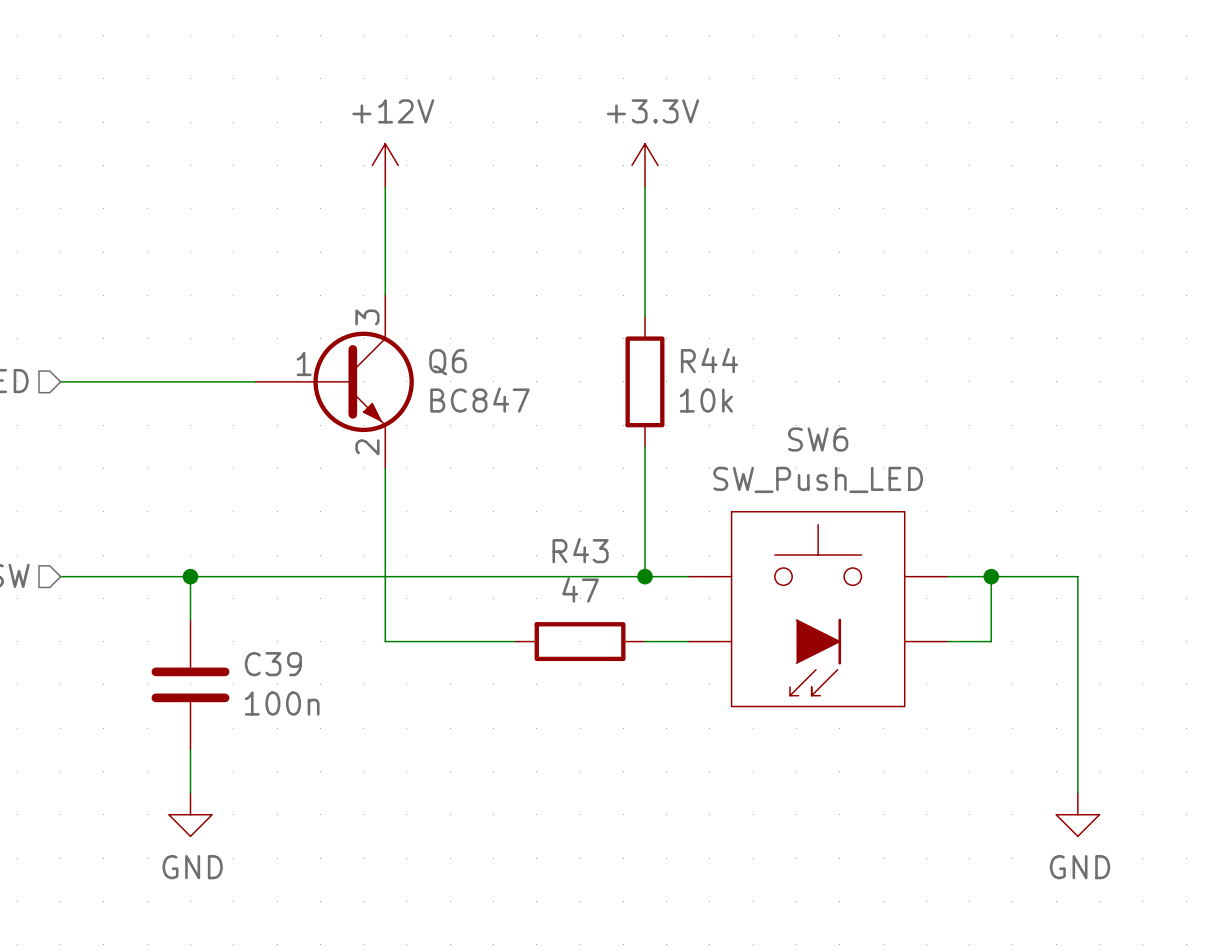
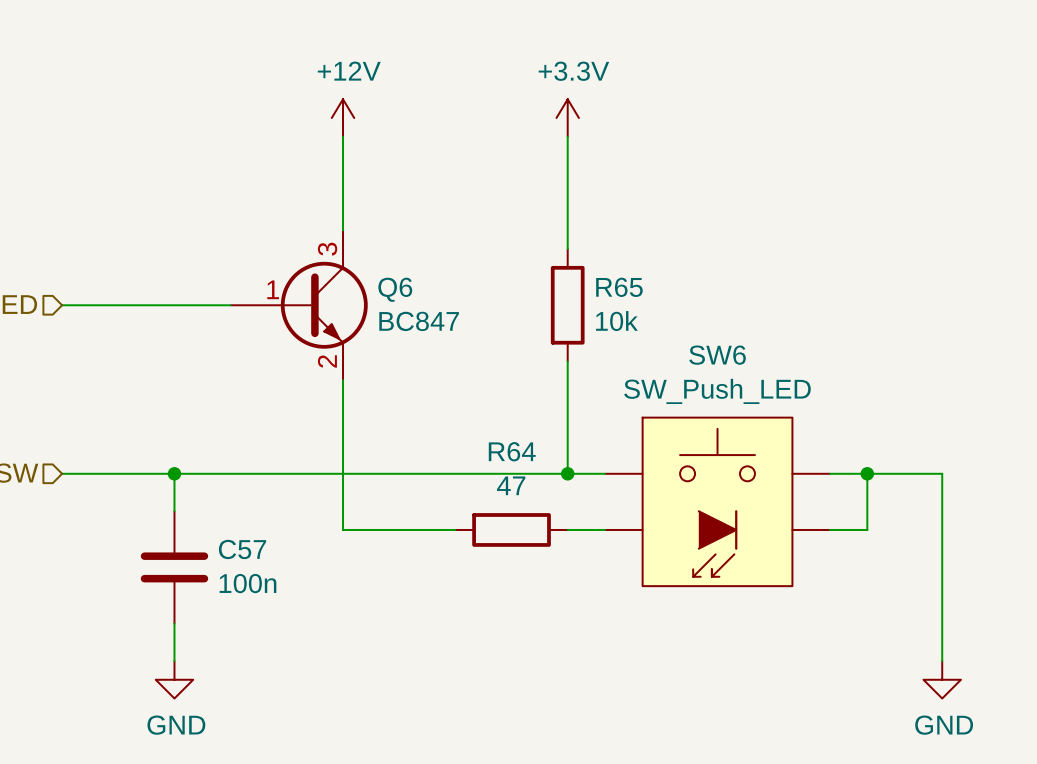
R44 name: R44 (709, 360) -> R65 (619, 287)
R43 name: R43 (580, 550) -> R64 (512, 451)
C39 name: C39 (273, 664) -> C57 (242, 549)

